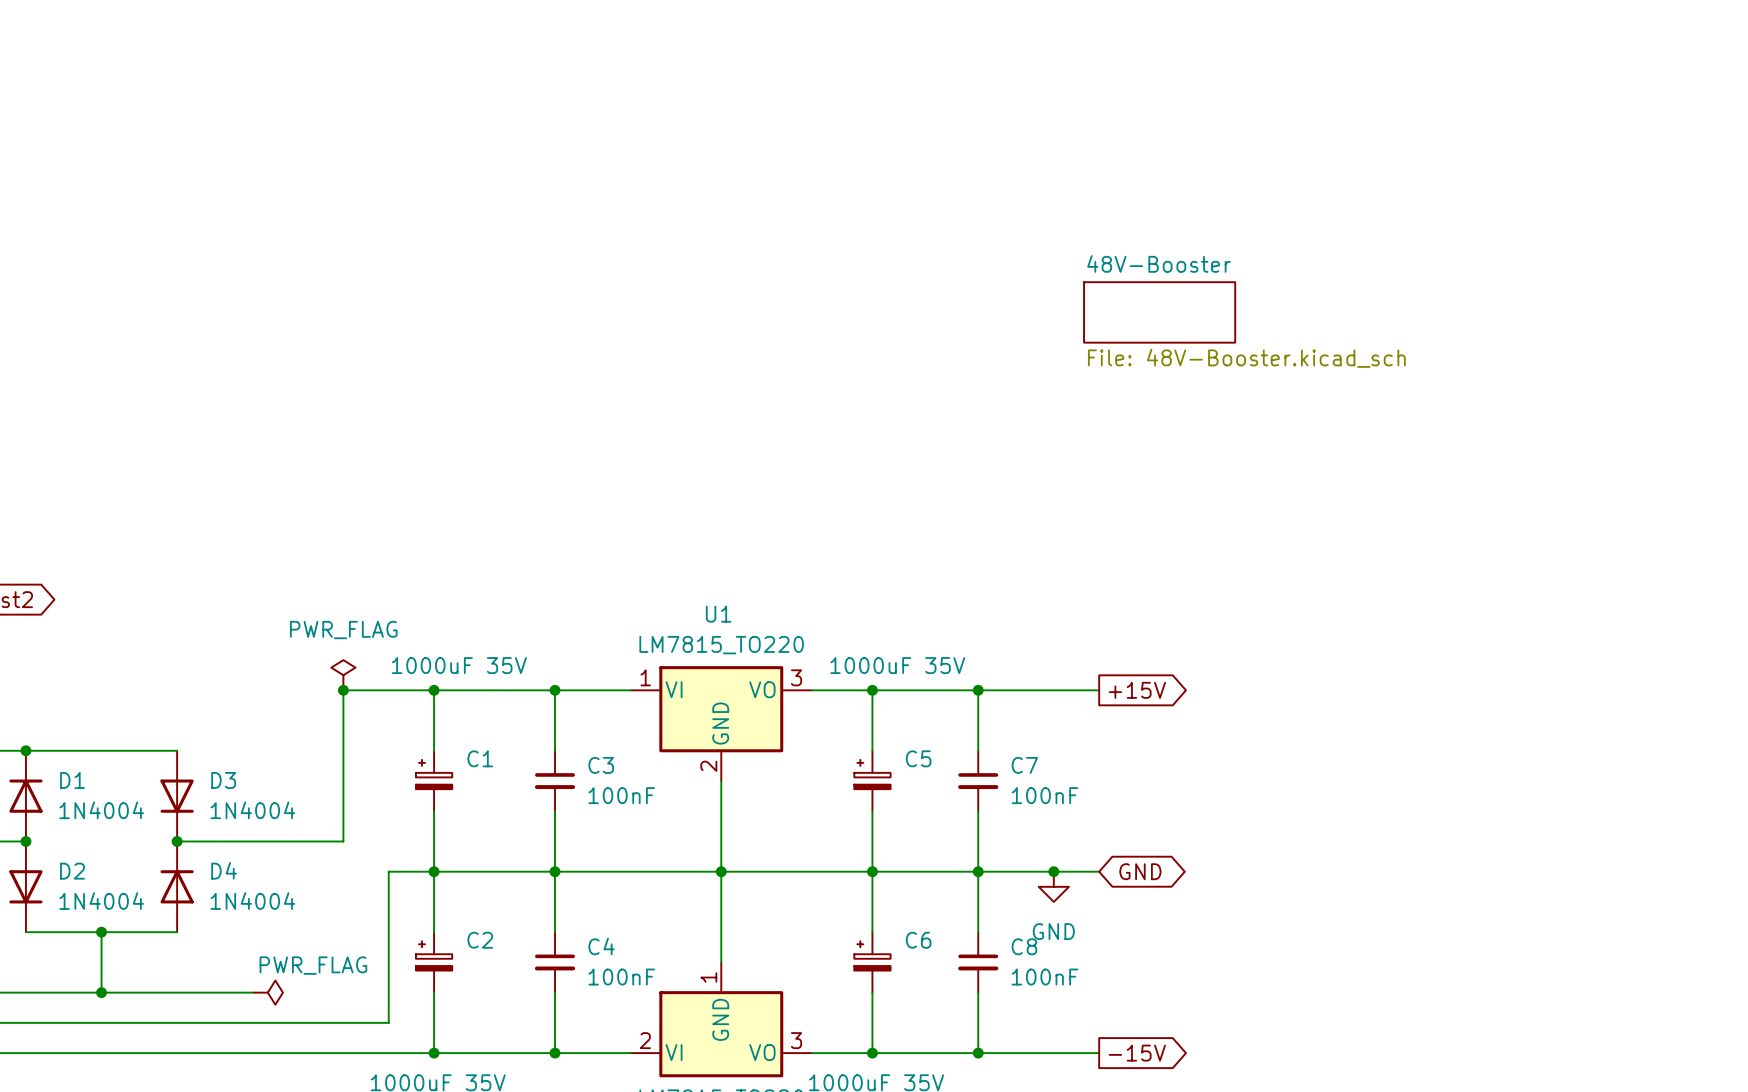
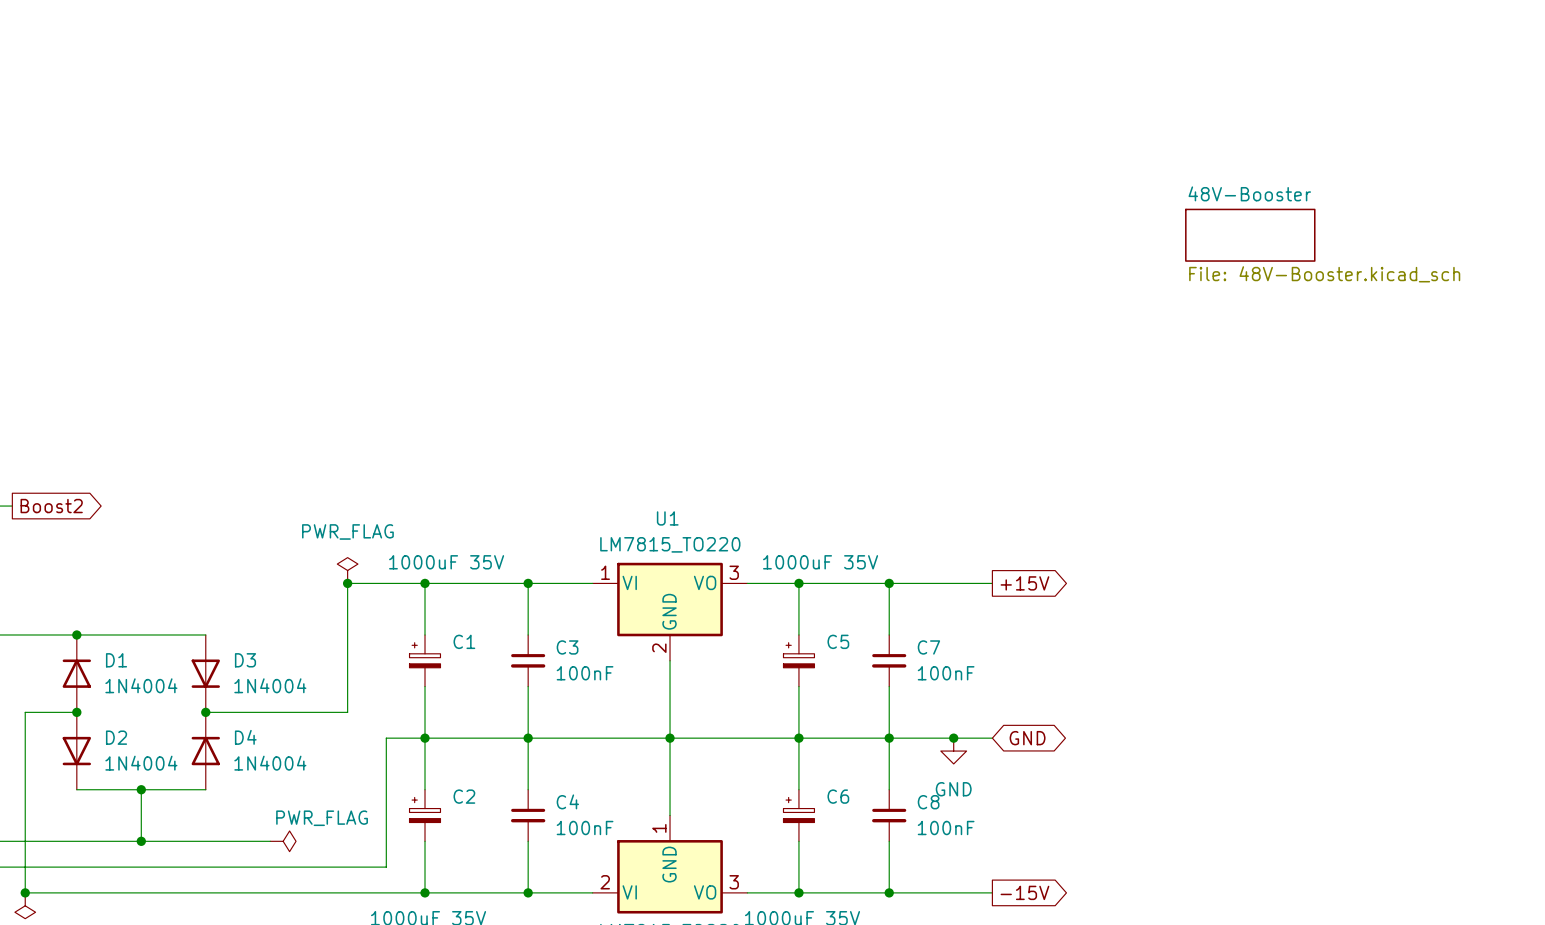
sheet 48V-Booster position: (1159, 312) -> (1250, 235)

